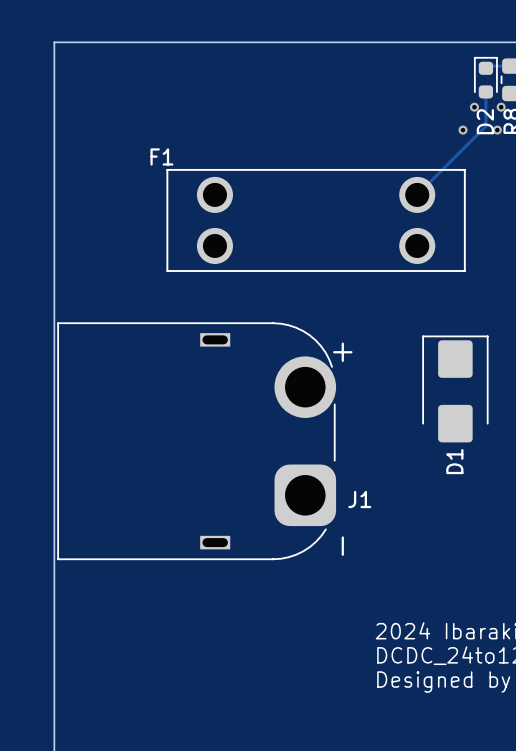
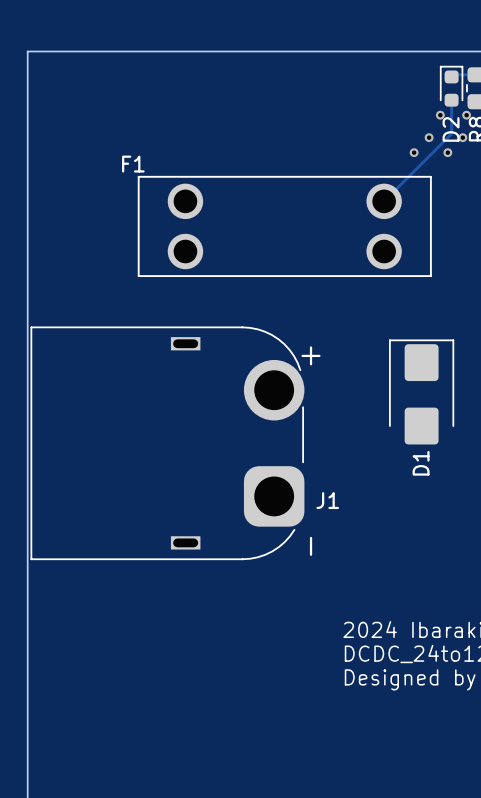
via: none -> (414, 152)
via: none -> (447, 152)

